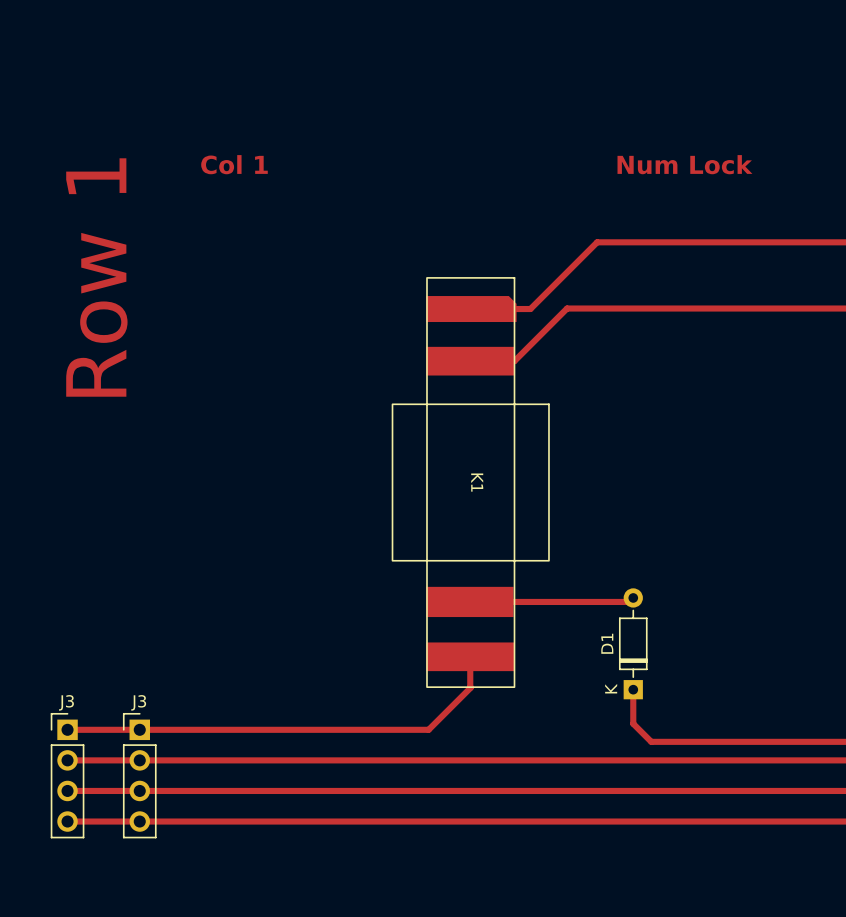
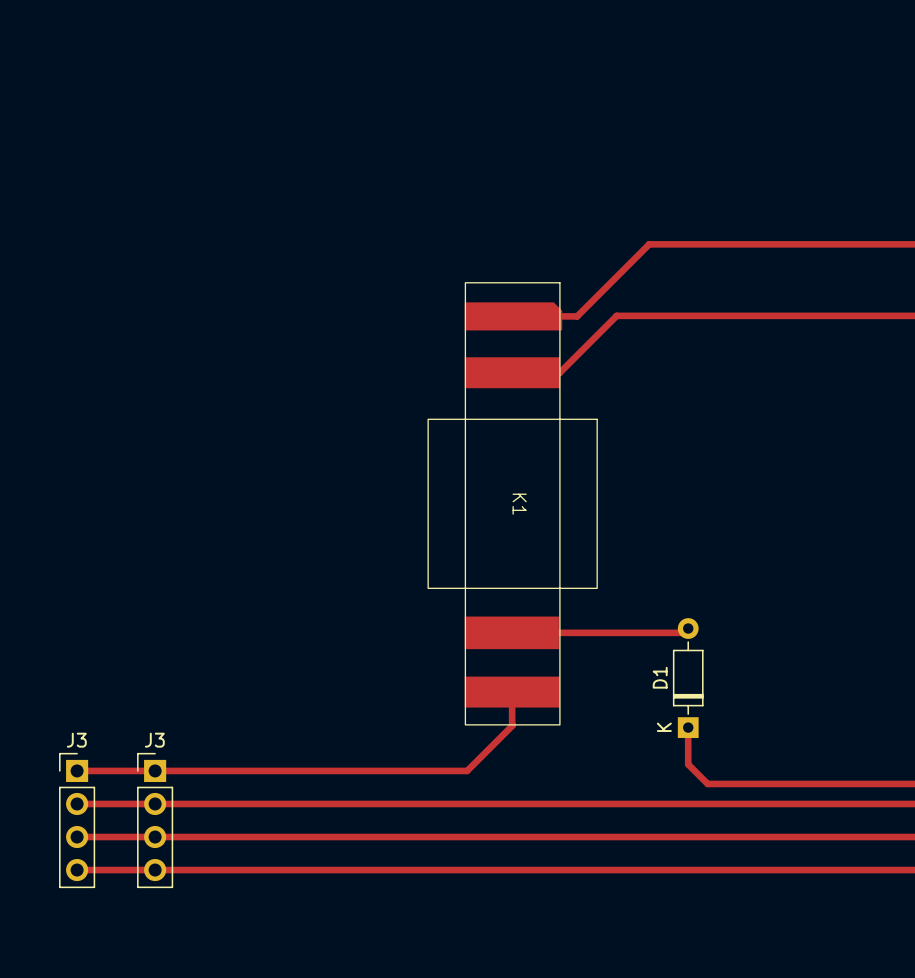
text: Col 1 (234, 164) -> none
text: Num Lock (684, 164) -> none
text: Row 1 (96, 277) -> none

